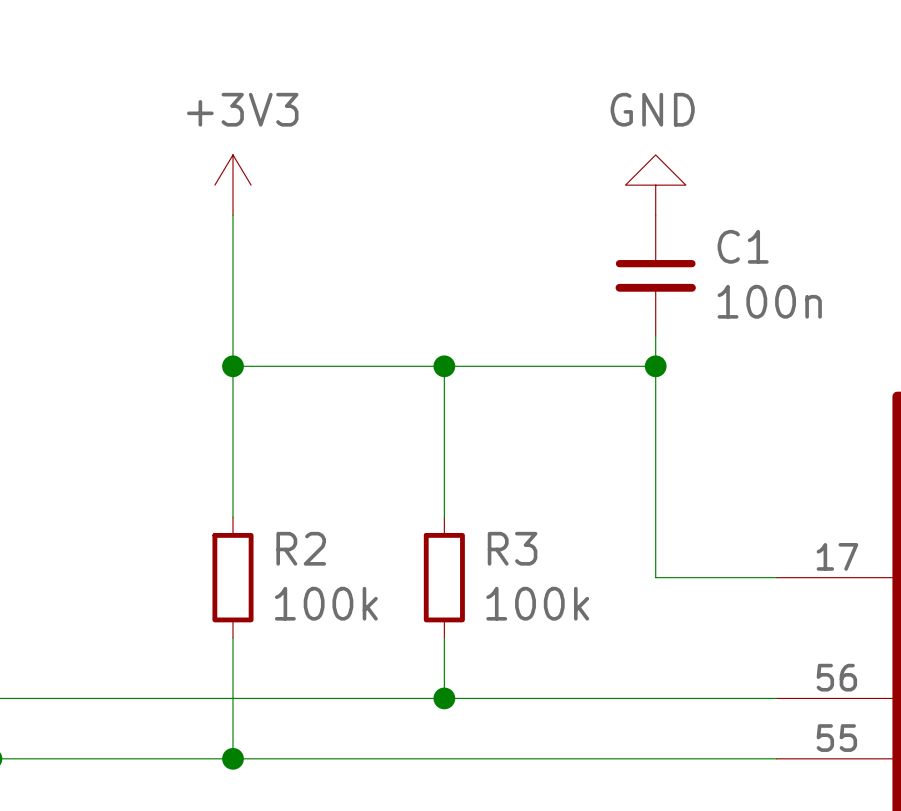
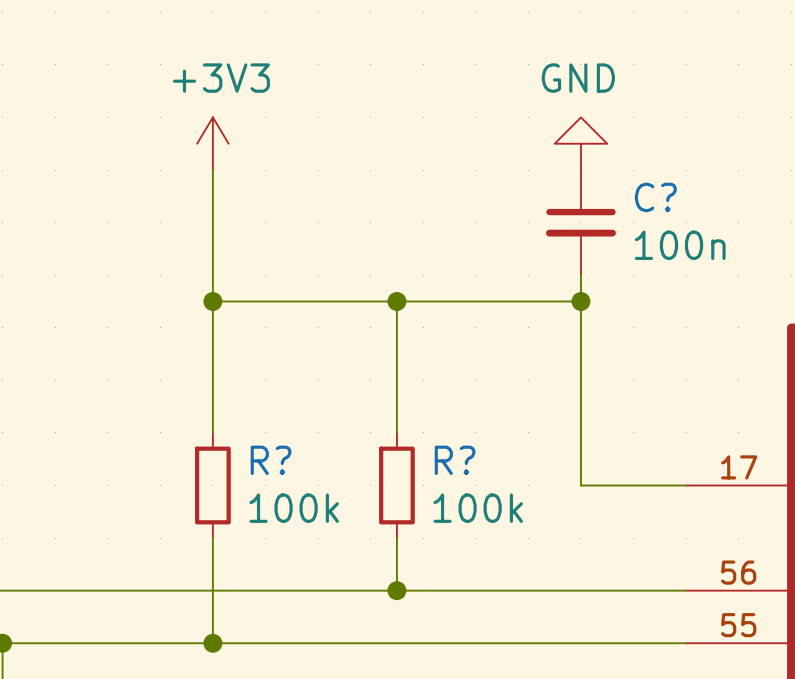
C1 name: C1 (743, 246) -> C? (655, 197)
R2 name: R2 (301, 548) -> R? (271, 460)
R3 name: R3 (512, 548) -> R? (455, 460)

